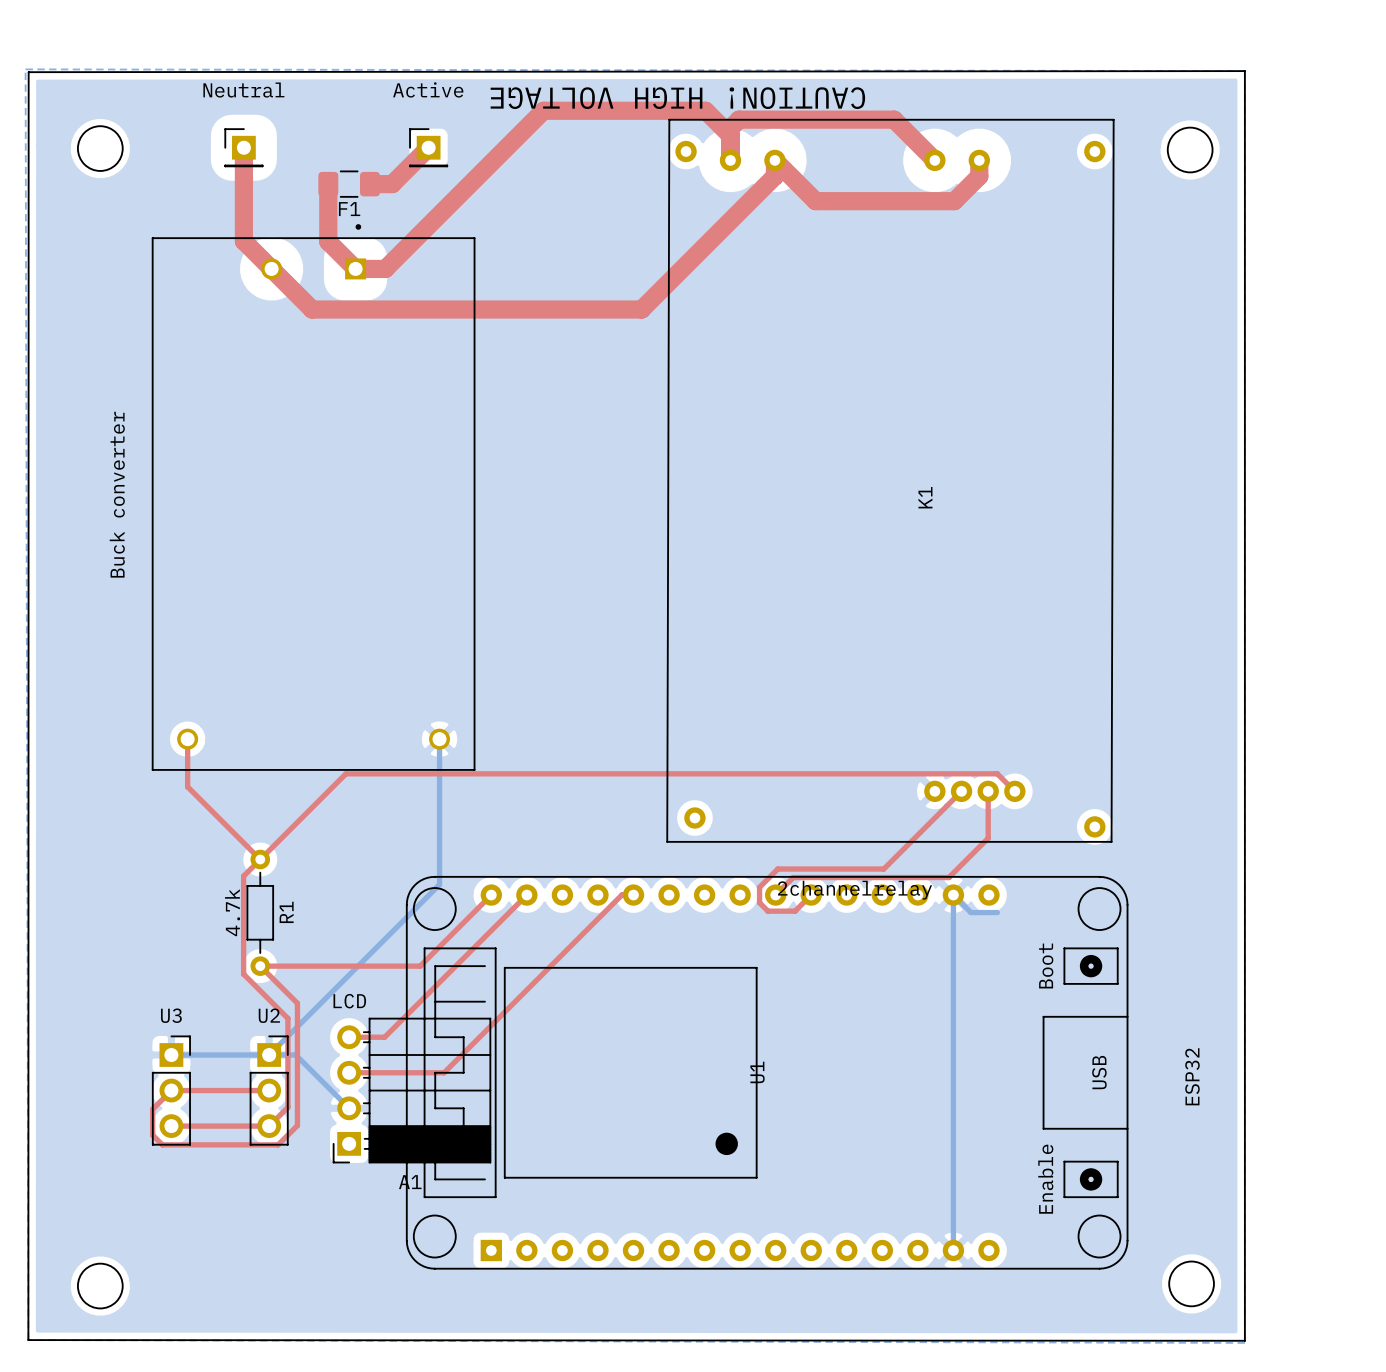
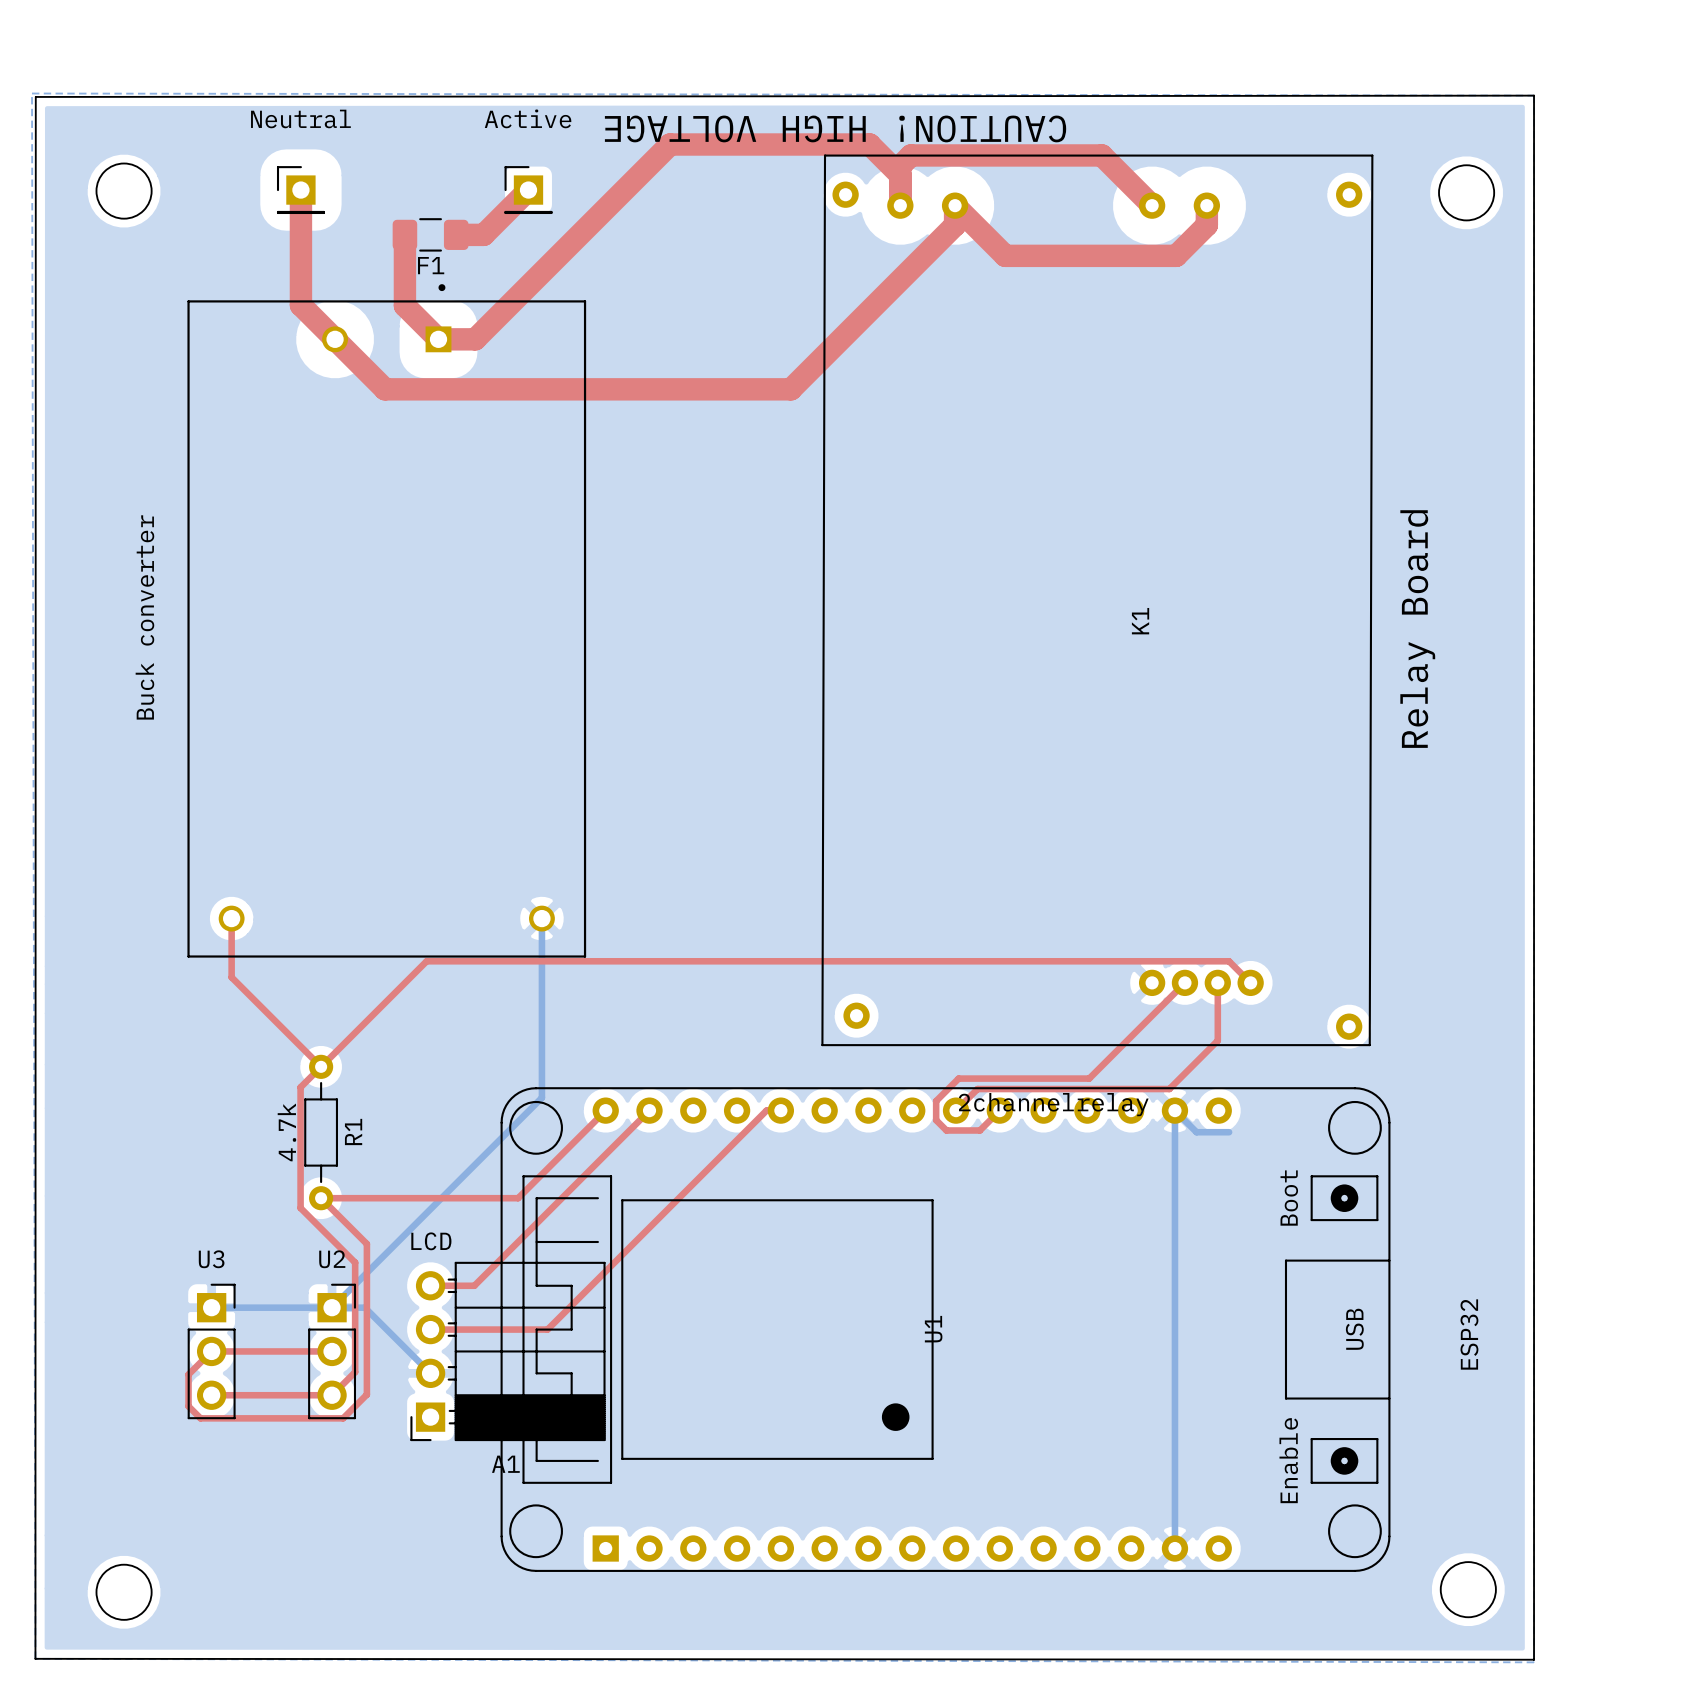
text: none -> Relay Board (1417, 629)

